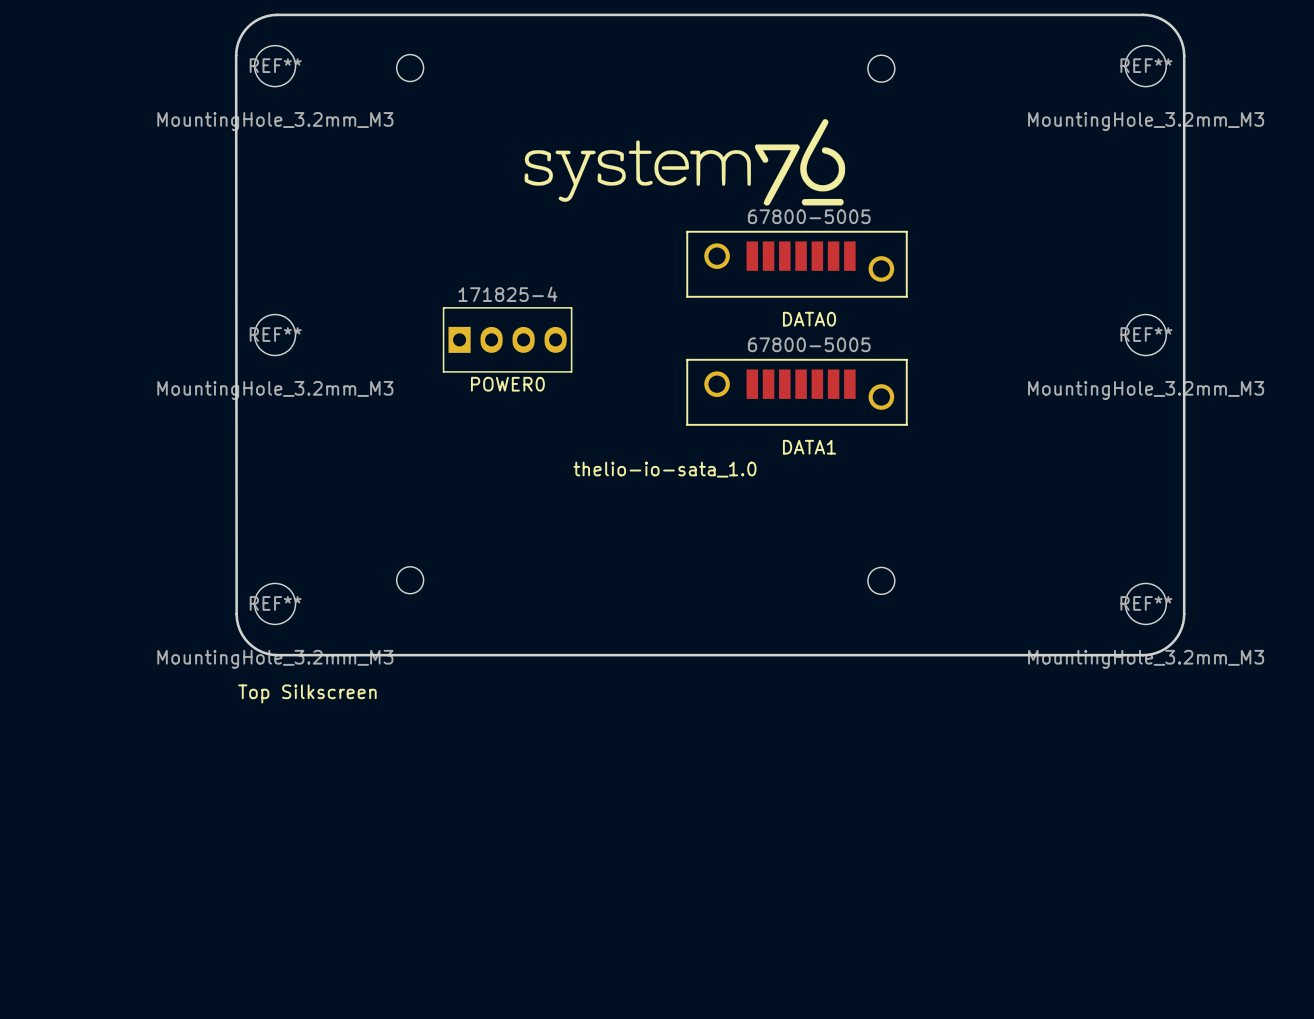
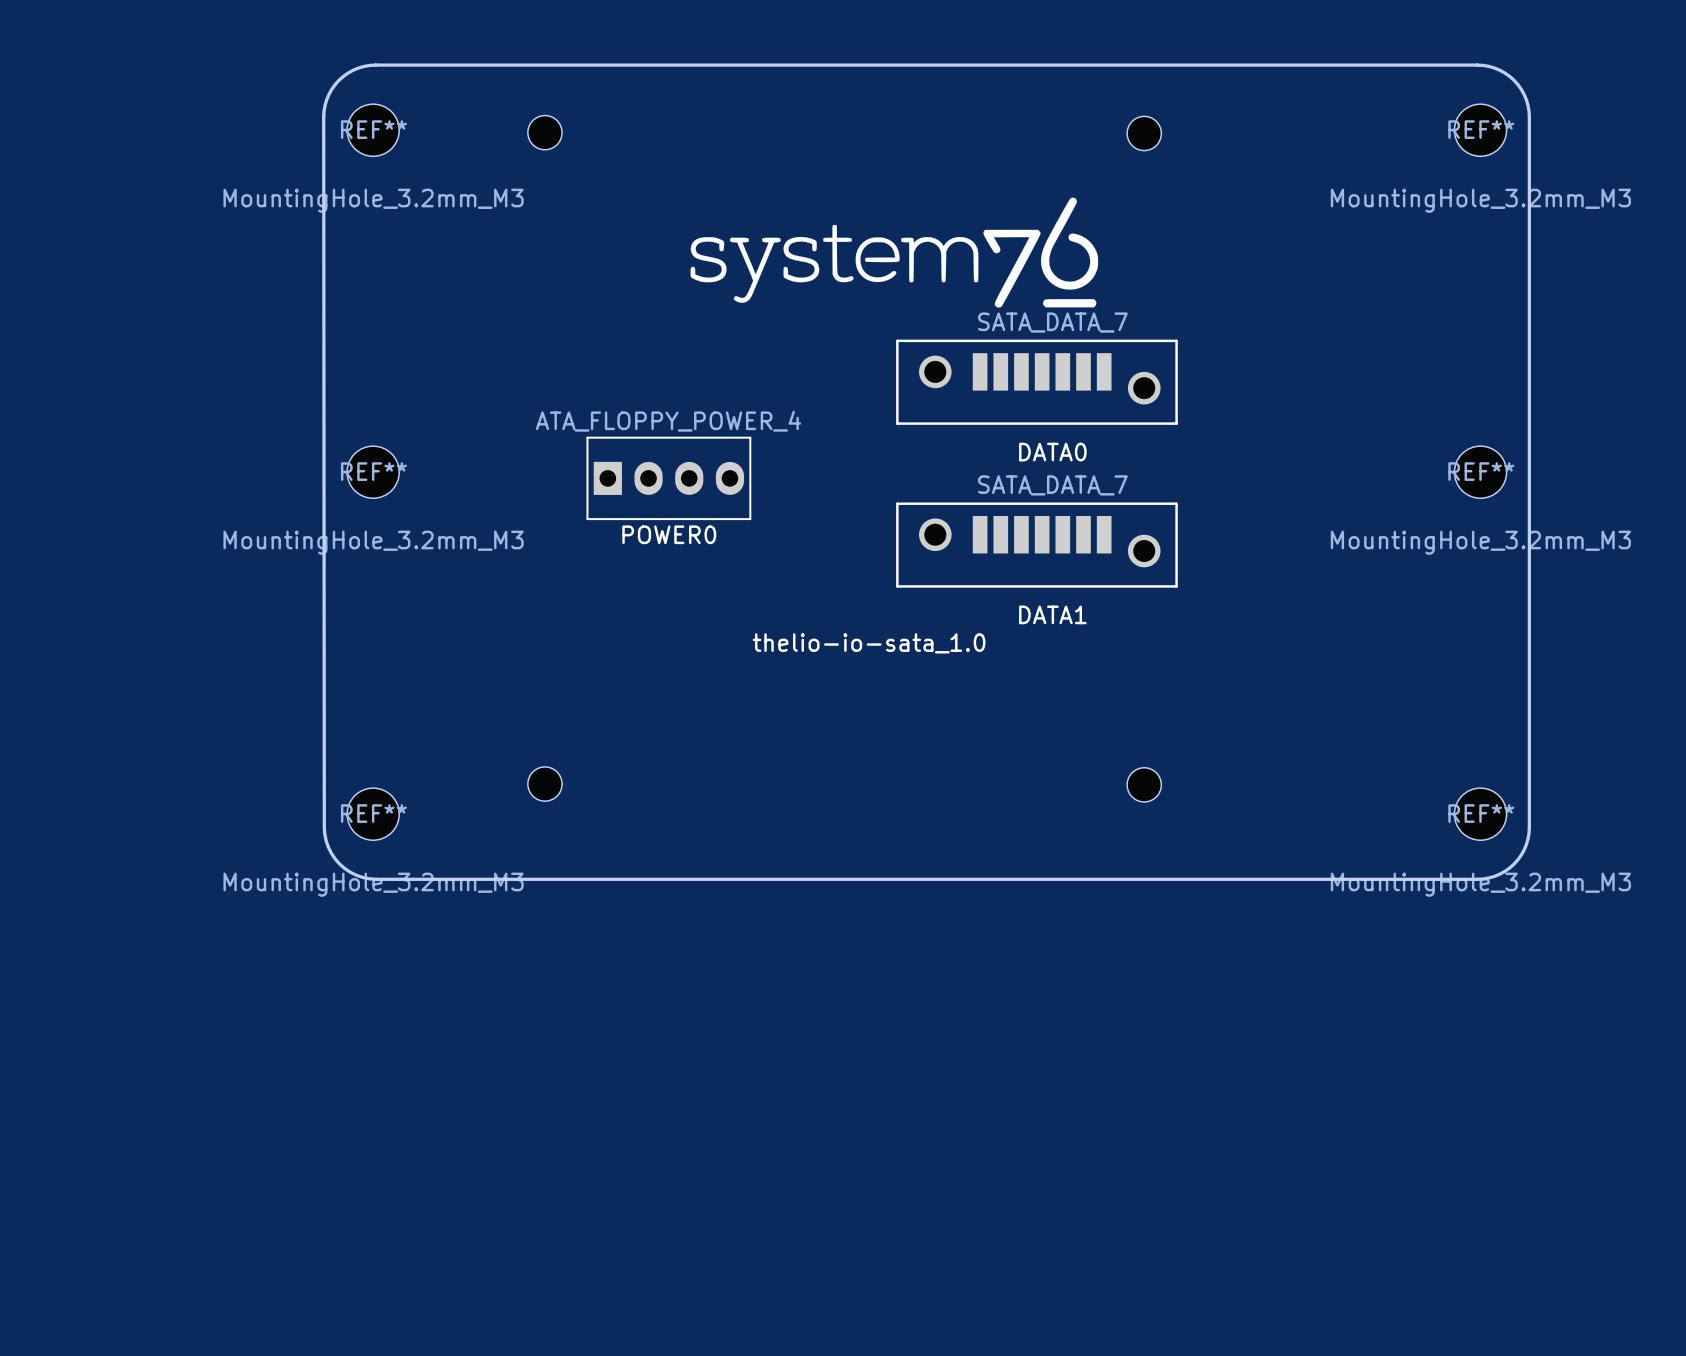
DATA0 value: 67800-5005 (809, 216) -> SATA_DATA_7 (1052, 322)
POWER0 value: 171825-4 (507, 294) -> ATA_FLOPPY_POWER_4 (668, 421)
DATA1 value: 67800-5005 (809, 344) -> SATA_DATA_7 (1052, 485)
text: Top Silkscreen (307, 693) -> none

